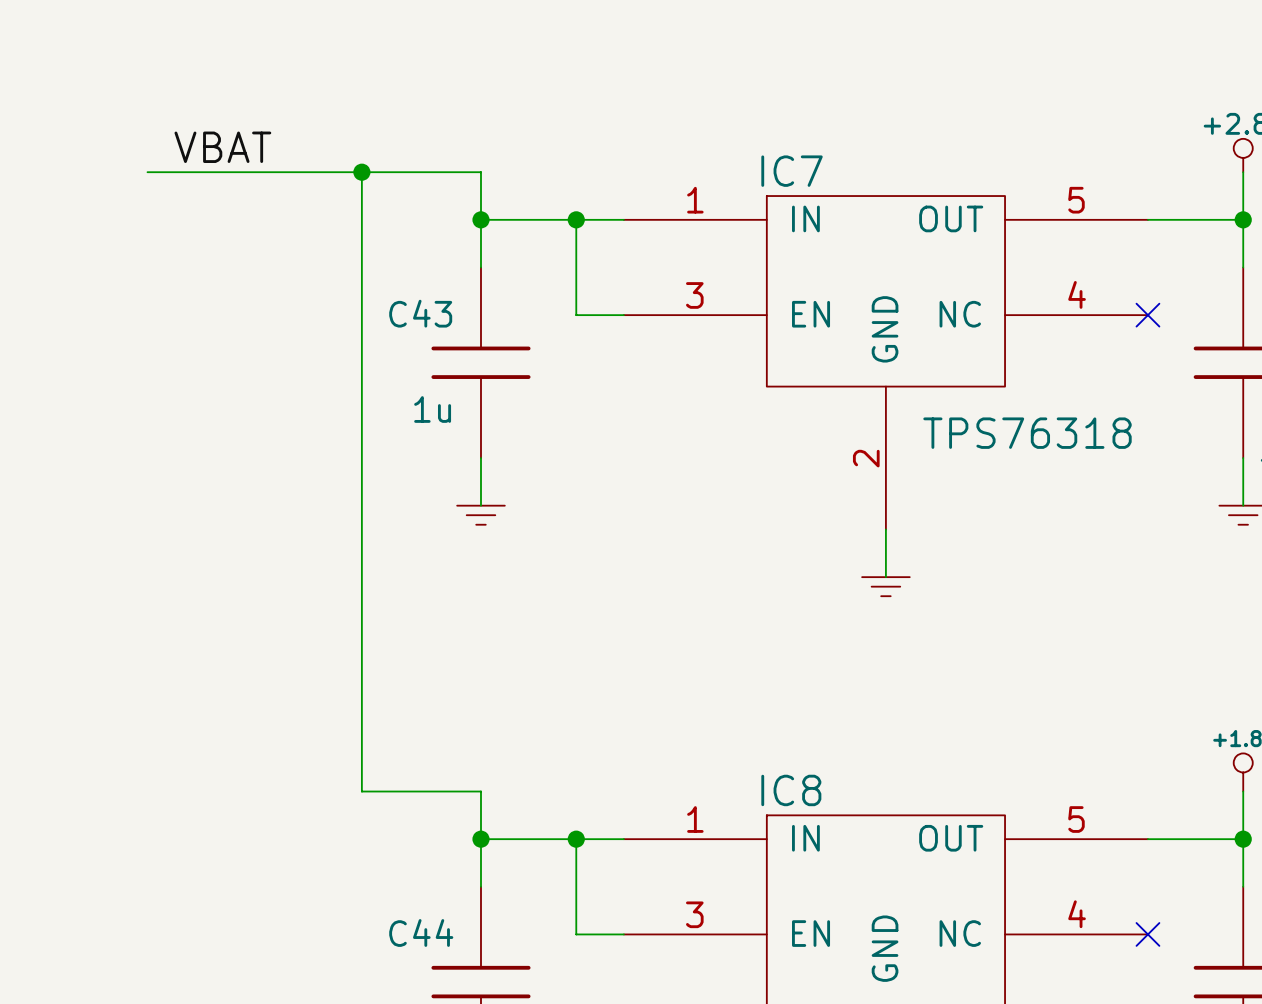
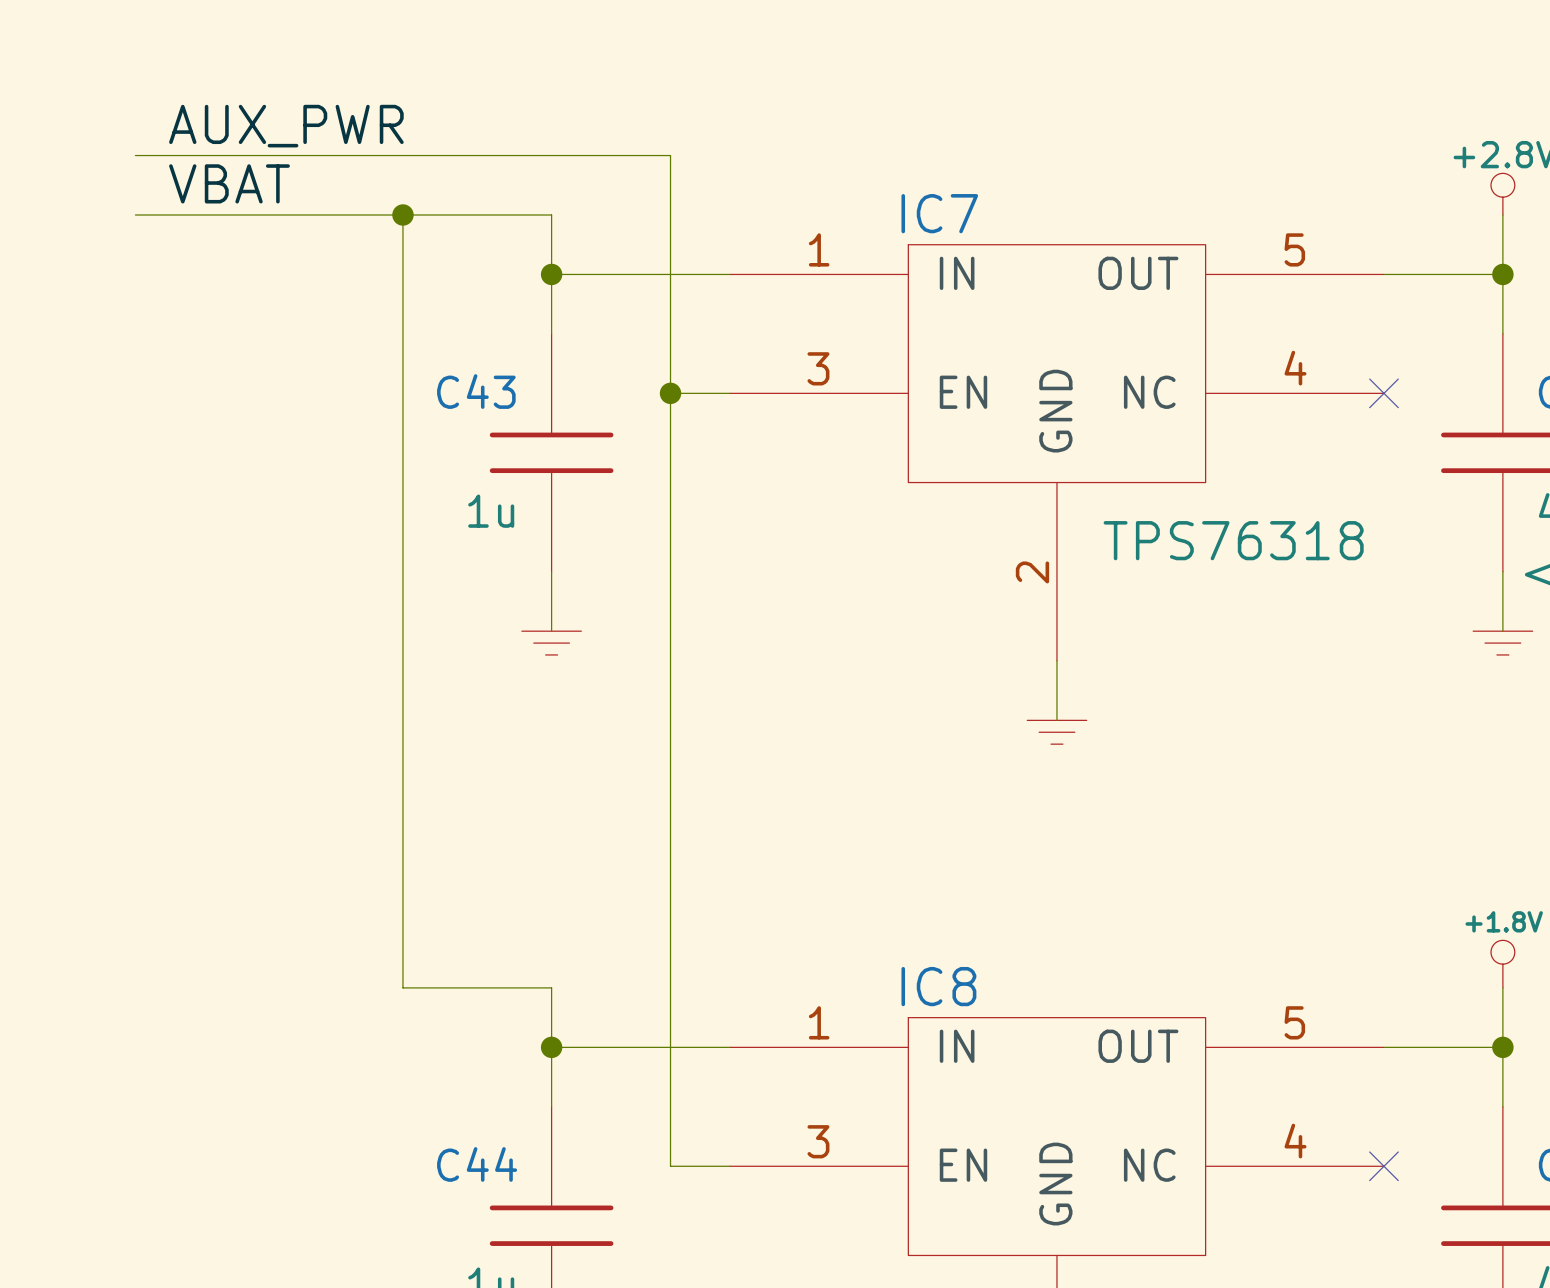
label: none -> AUX_PWR (286, 126)
wire: none -> (135, 155) (670, 155) (670, 274)
junction position: (576, 219) -> (670, 393)
wire: none -> (670, 393) (670, 1047)
junction: (576, 839) -> none

